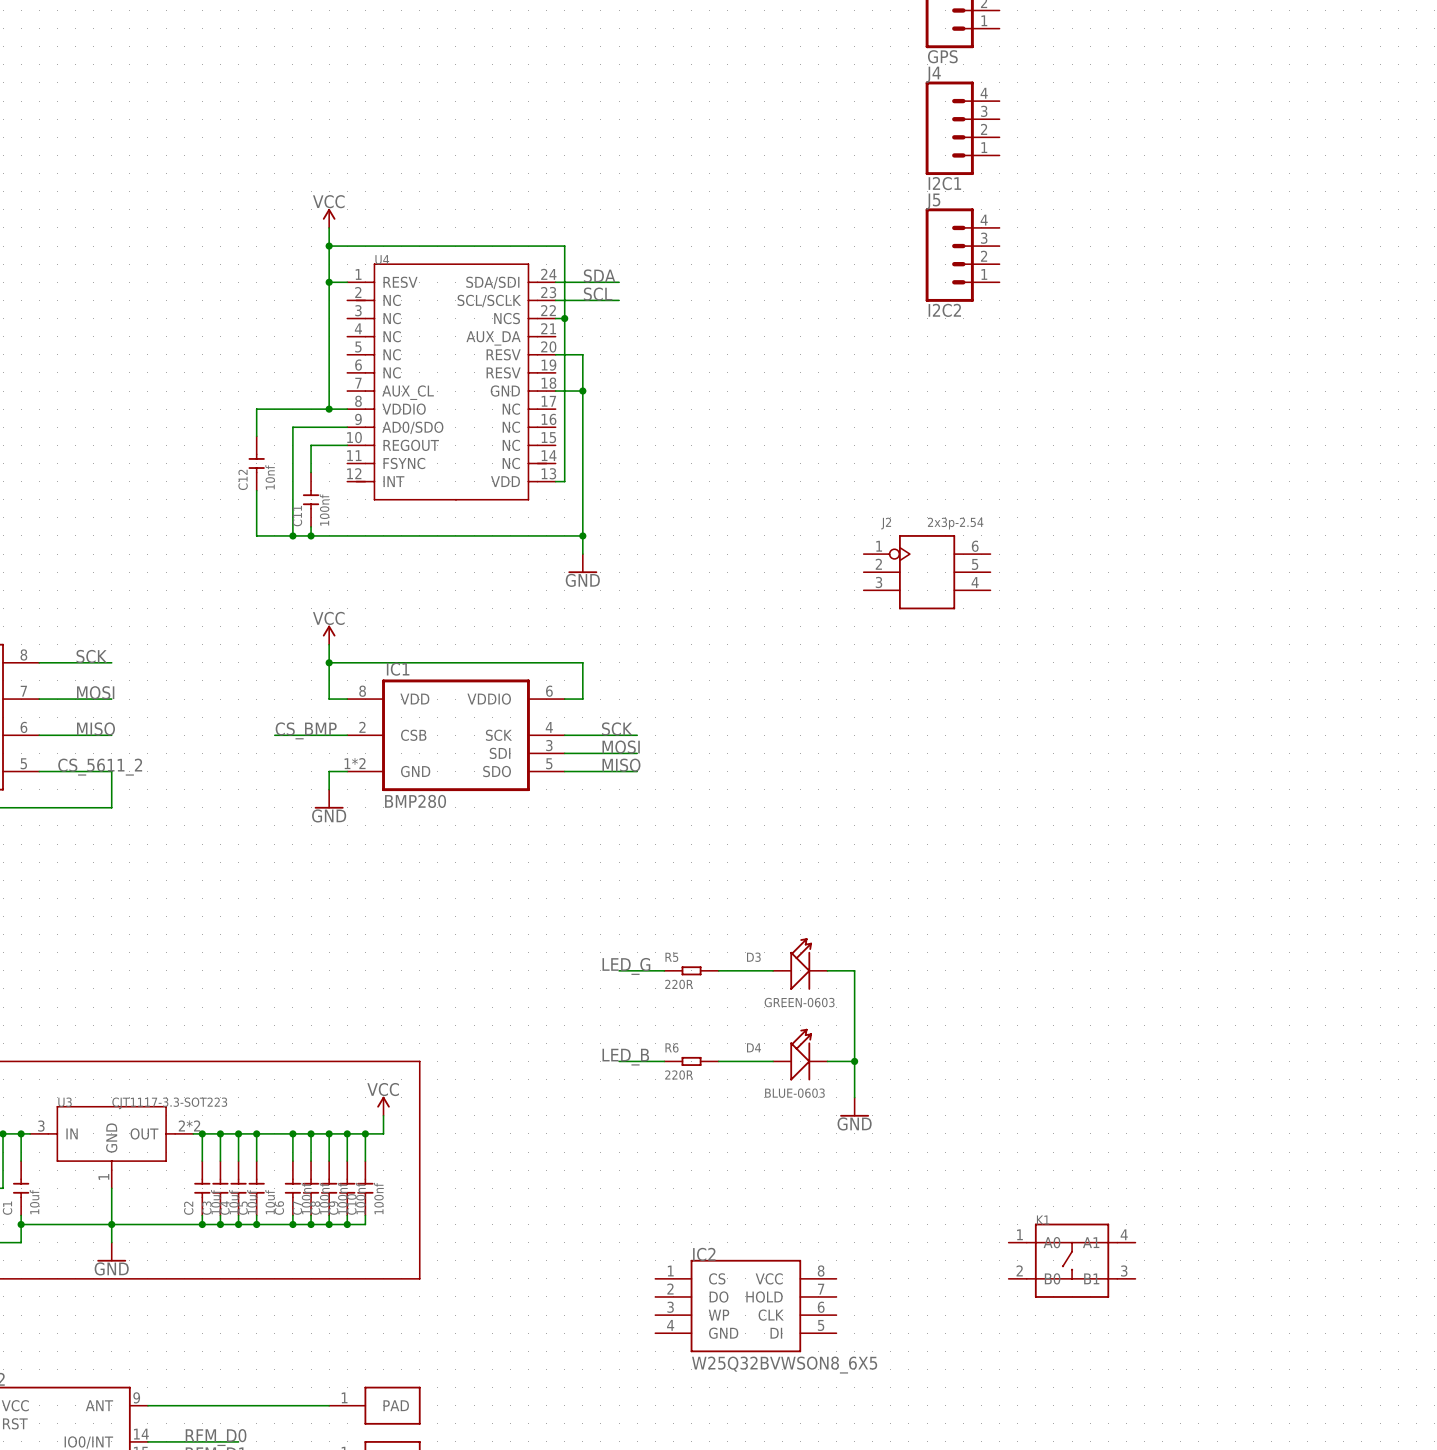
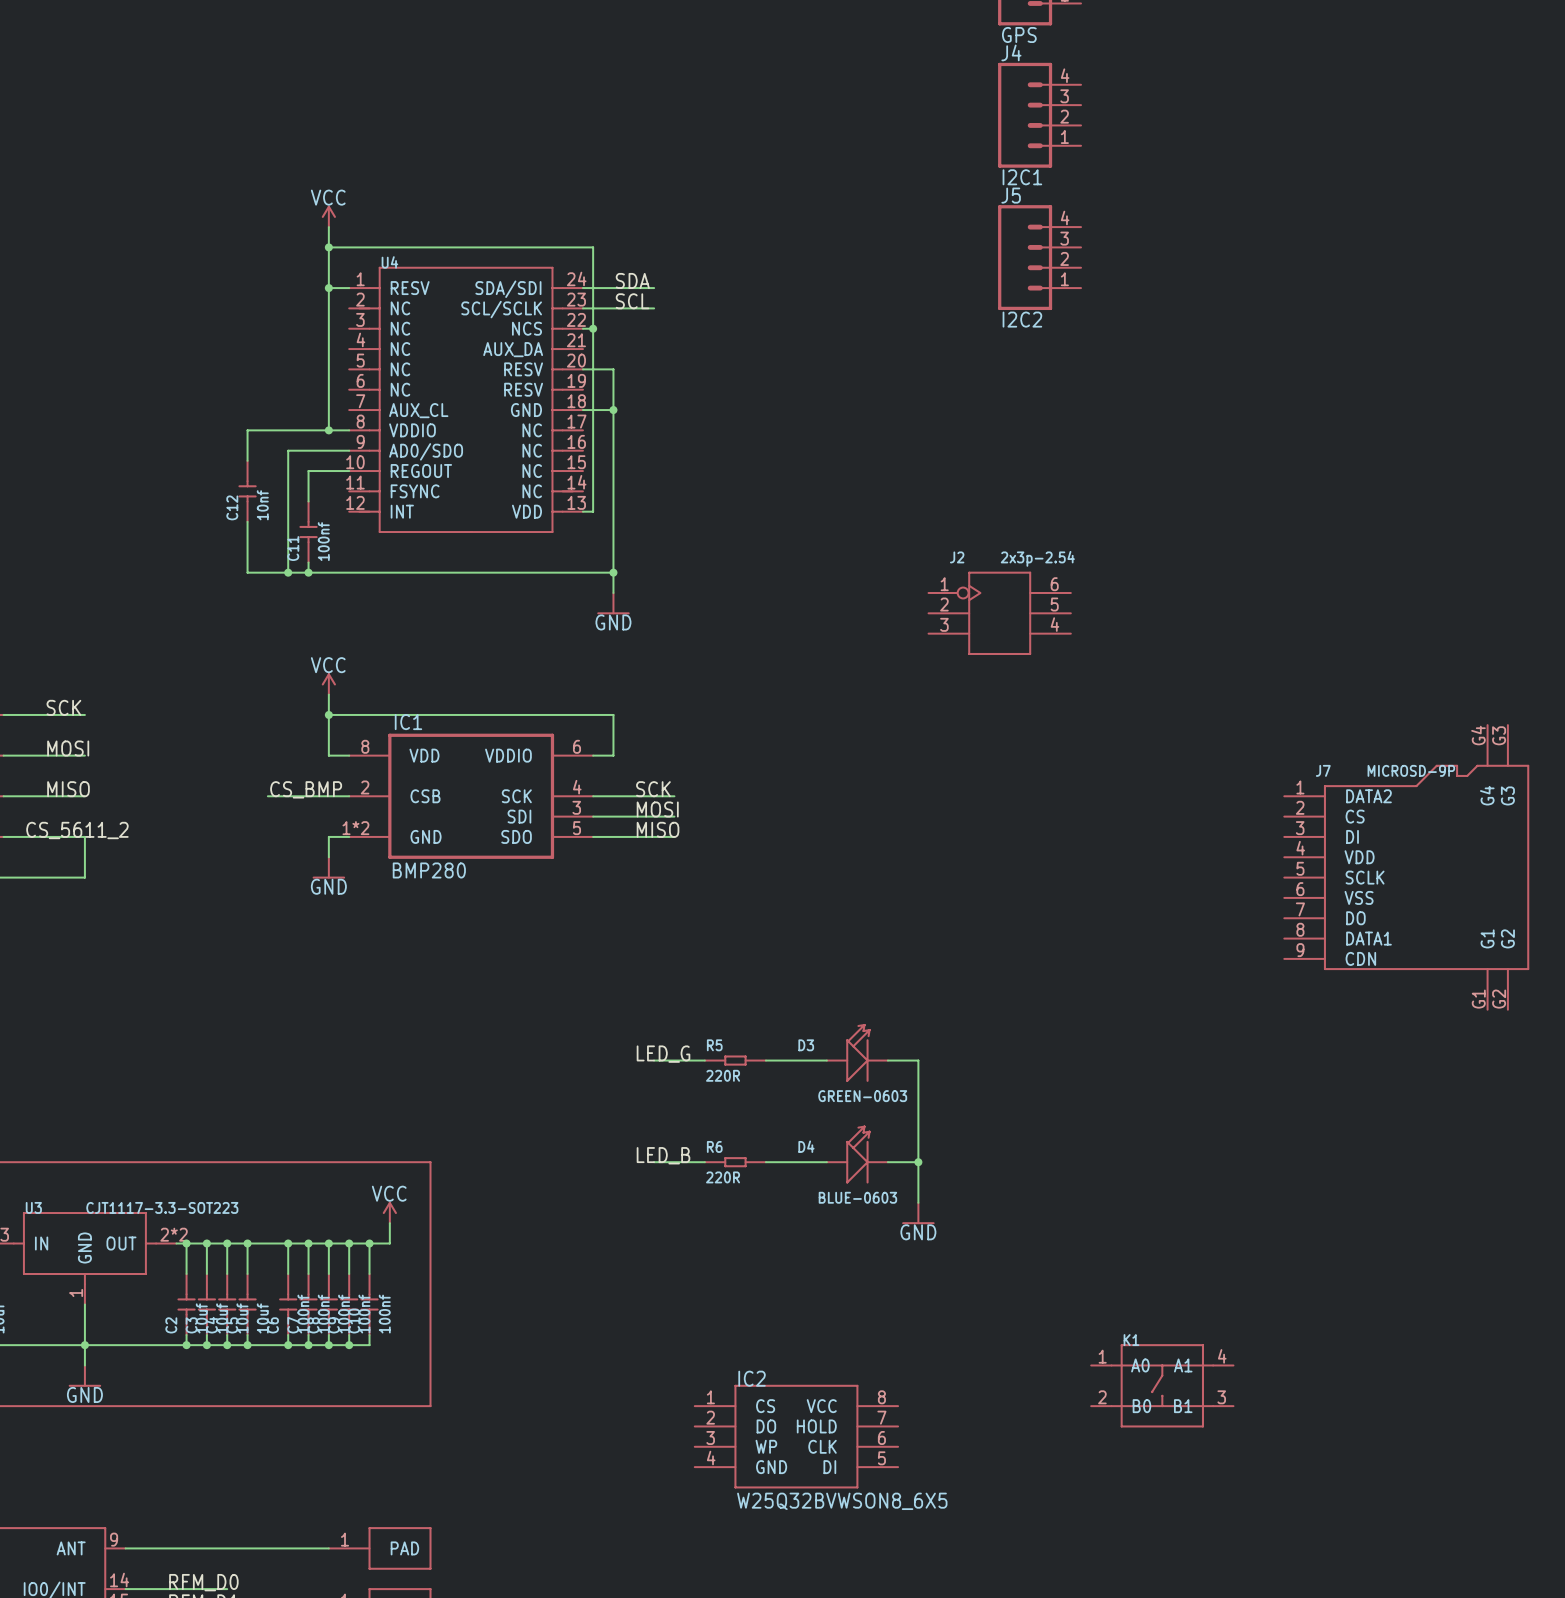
J7: none -> MICROSD-9P (1406, 867)

